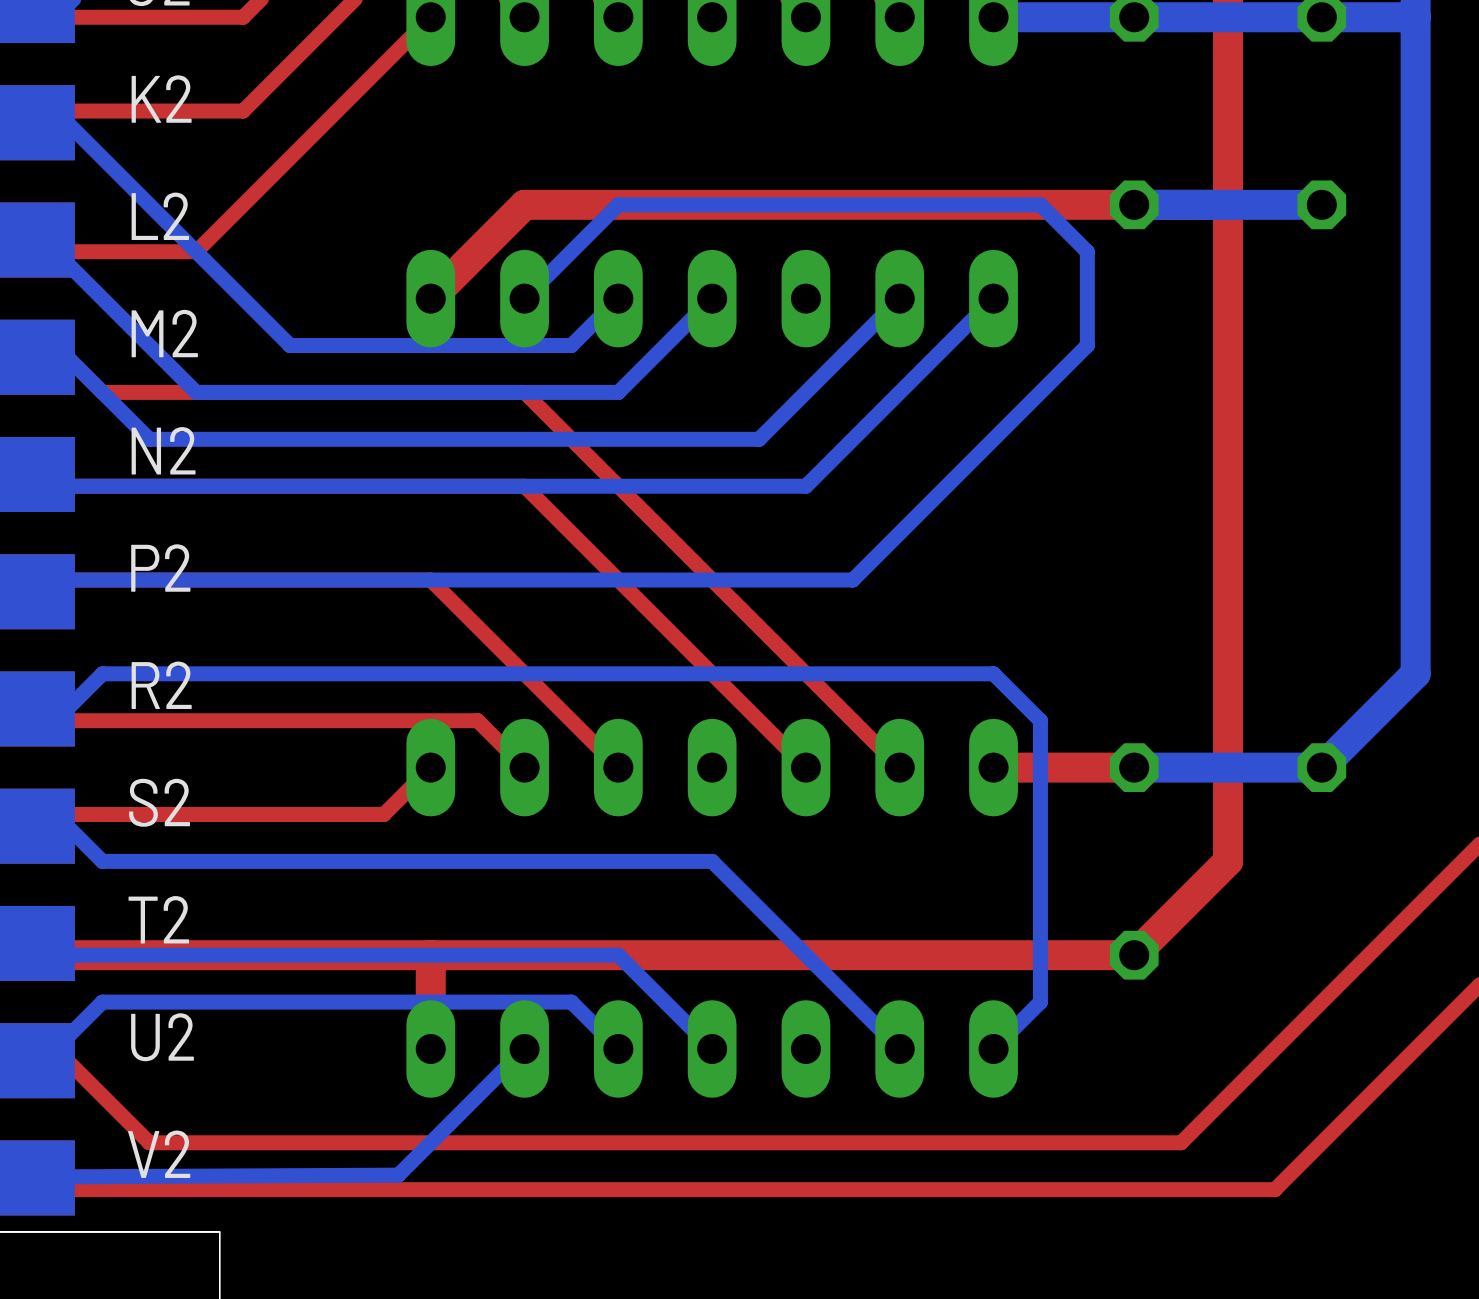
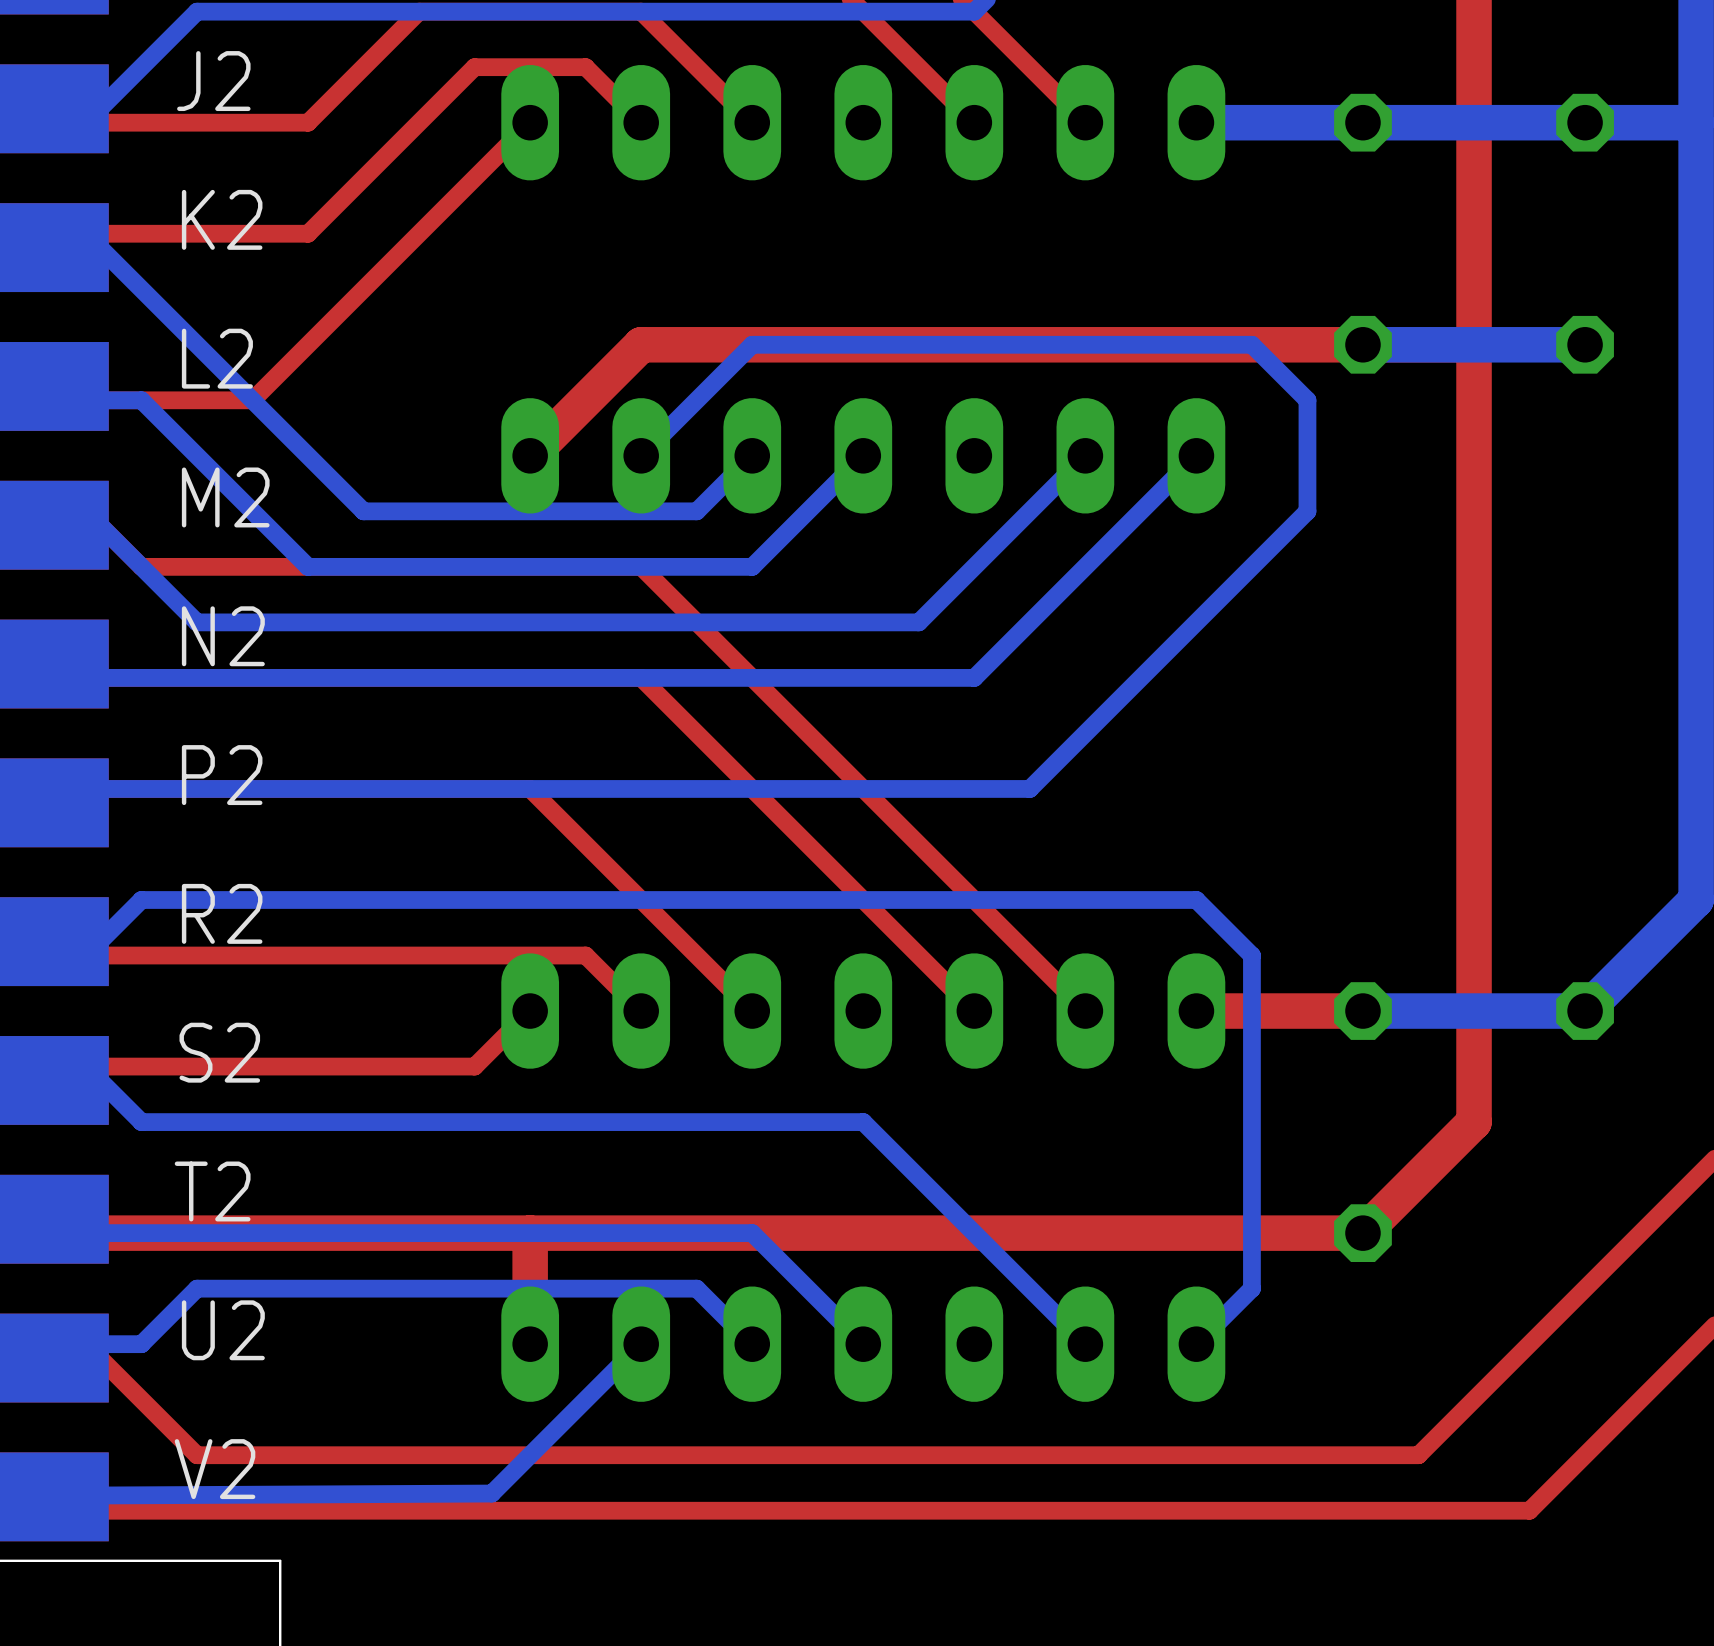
bottom track: (55, 251) (196, 392) (243, 392) -> (85, 400) (141, 400) (308, 566)
bottom track: (149, 1002) (102, 1002) (55, 1048) -> (197, 1288) (141, 1344) (85, 1344)

